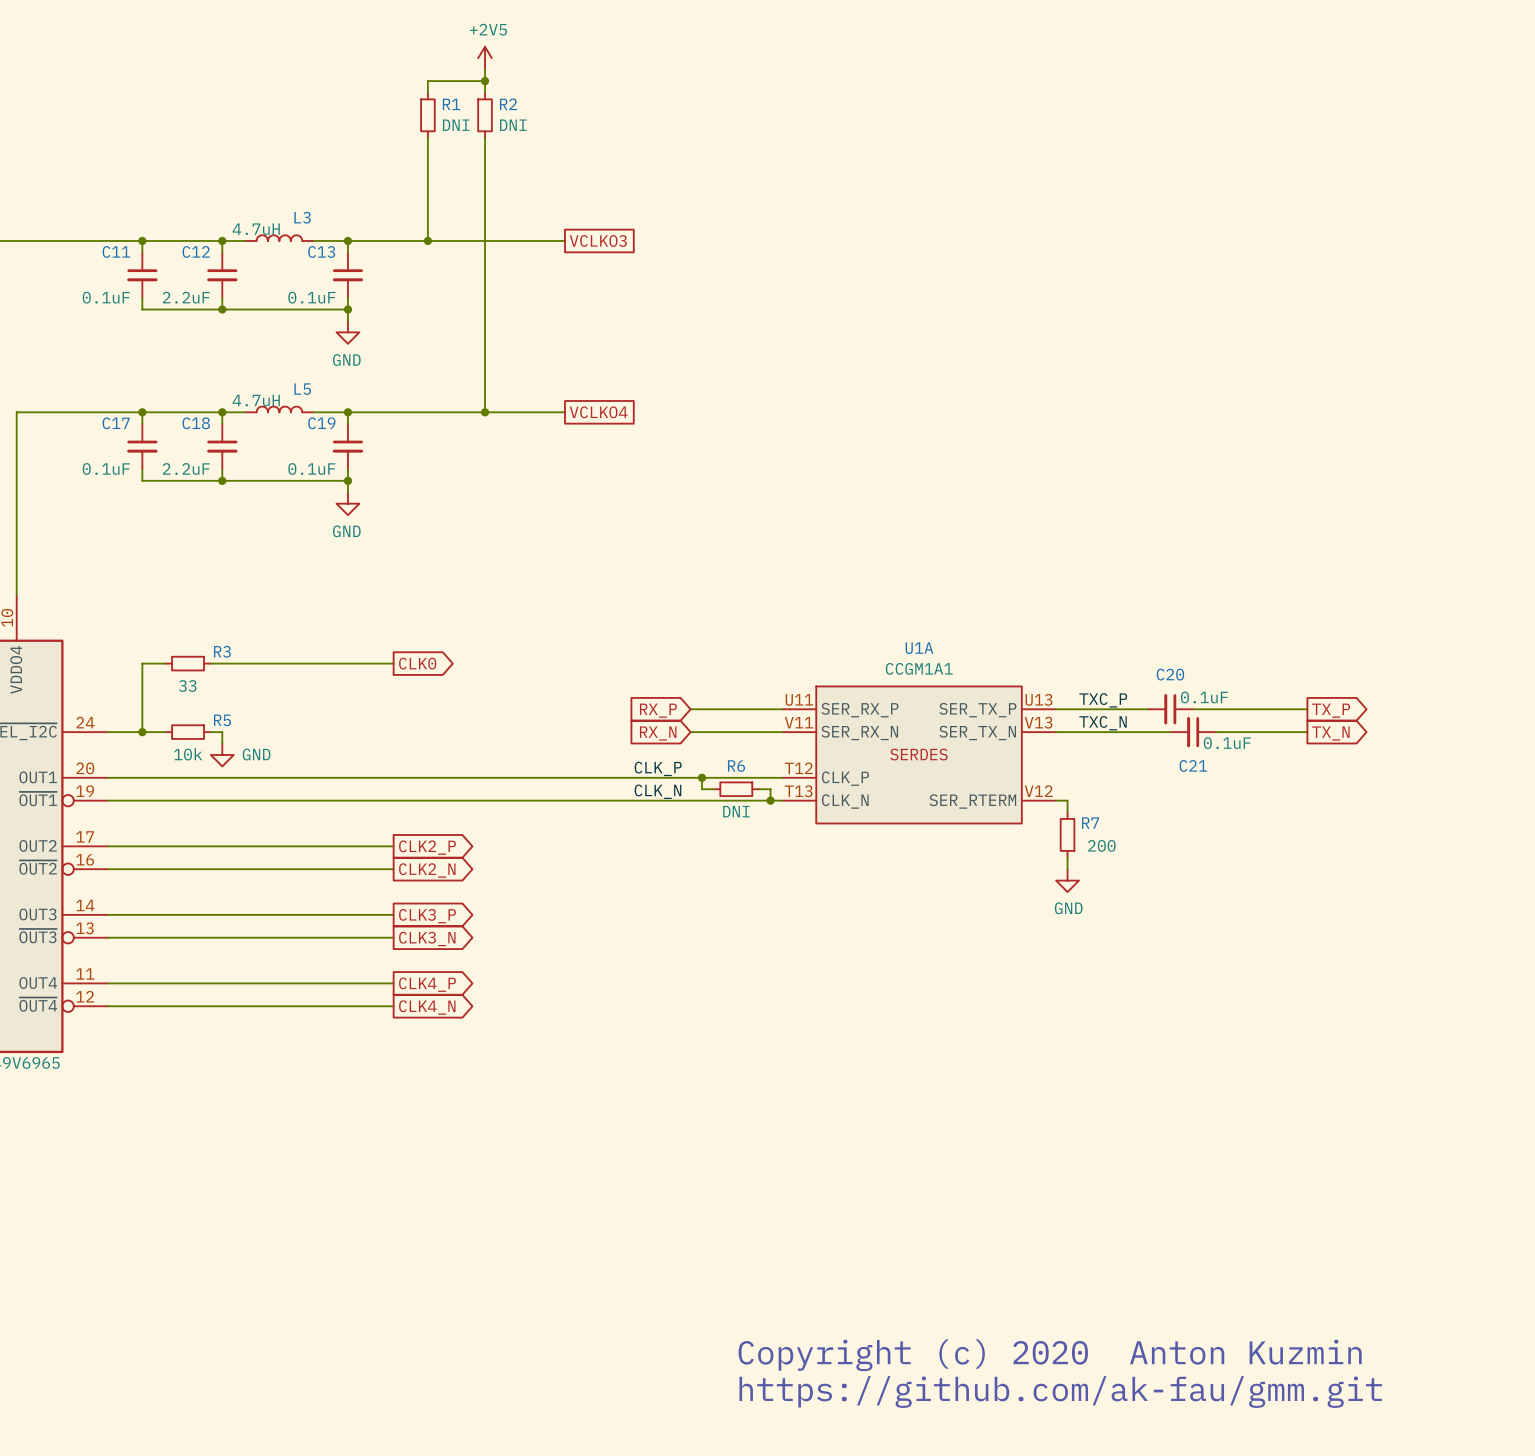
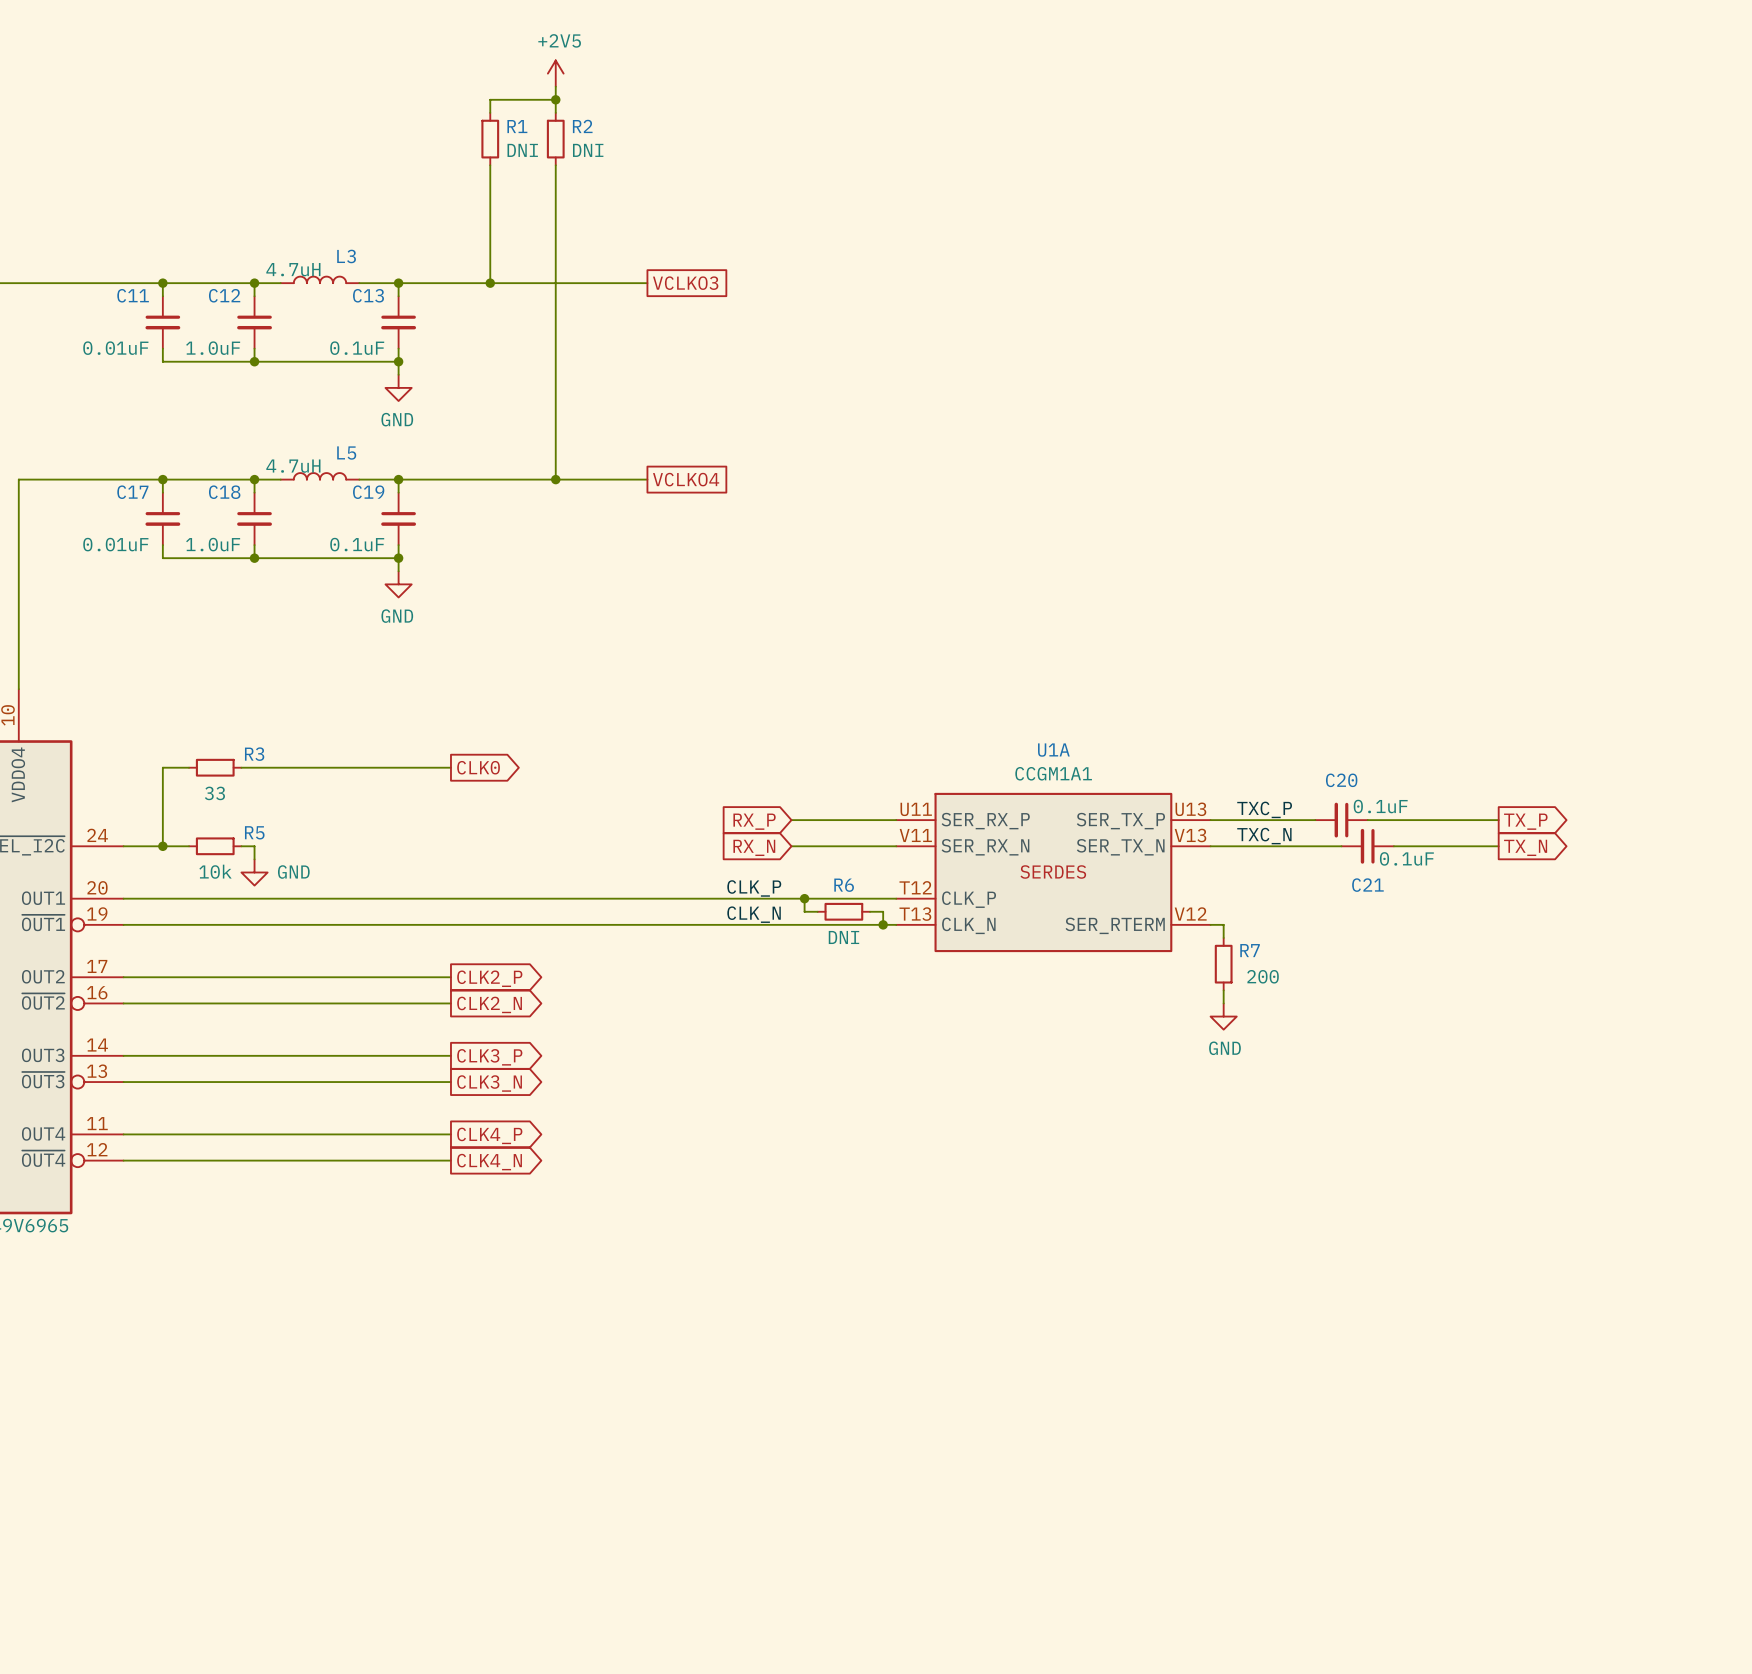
C11 value: 0.1uF (106, 297) -> 0.01uF (115, 348)
C12 value: 2.2uF (186, 297) -> 1.0uF (213, 348)
C17 value: 0.1uF (106, 468) -> 0.01uF (115, 544)
C18 value: 2.2uF (186, 468) -> 1.0uF (213, 544)
text: Copyright (c) 2020 Anton Kuzmin (1050, 1355) -> none
text: https://github.com/ak-fau/gmm.git (1060, 1392) -> none

